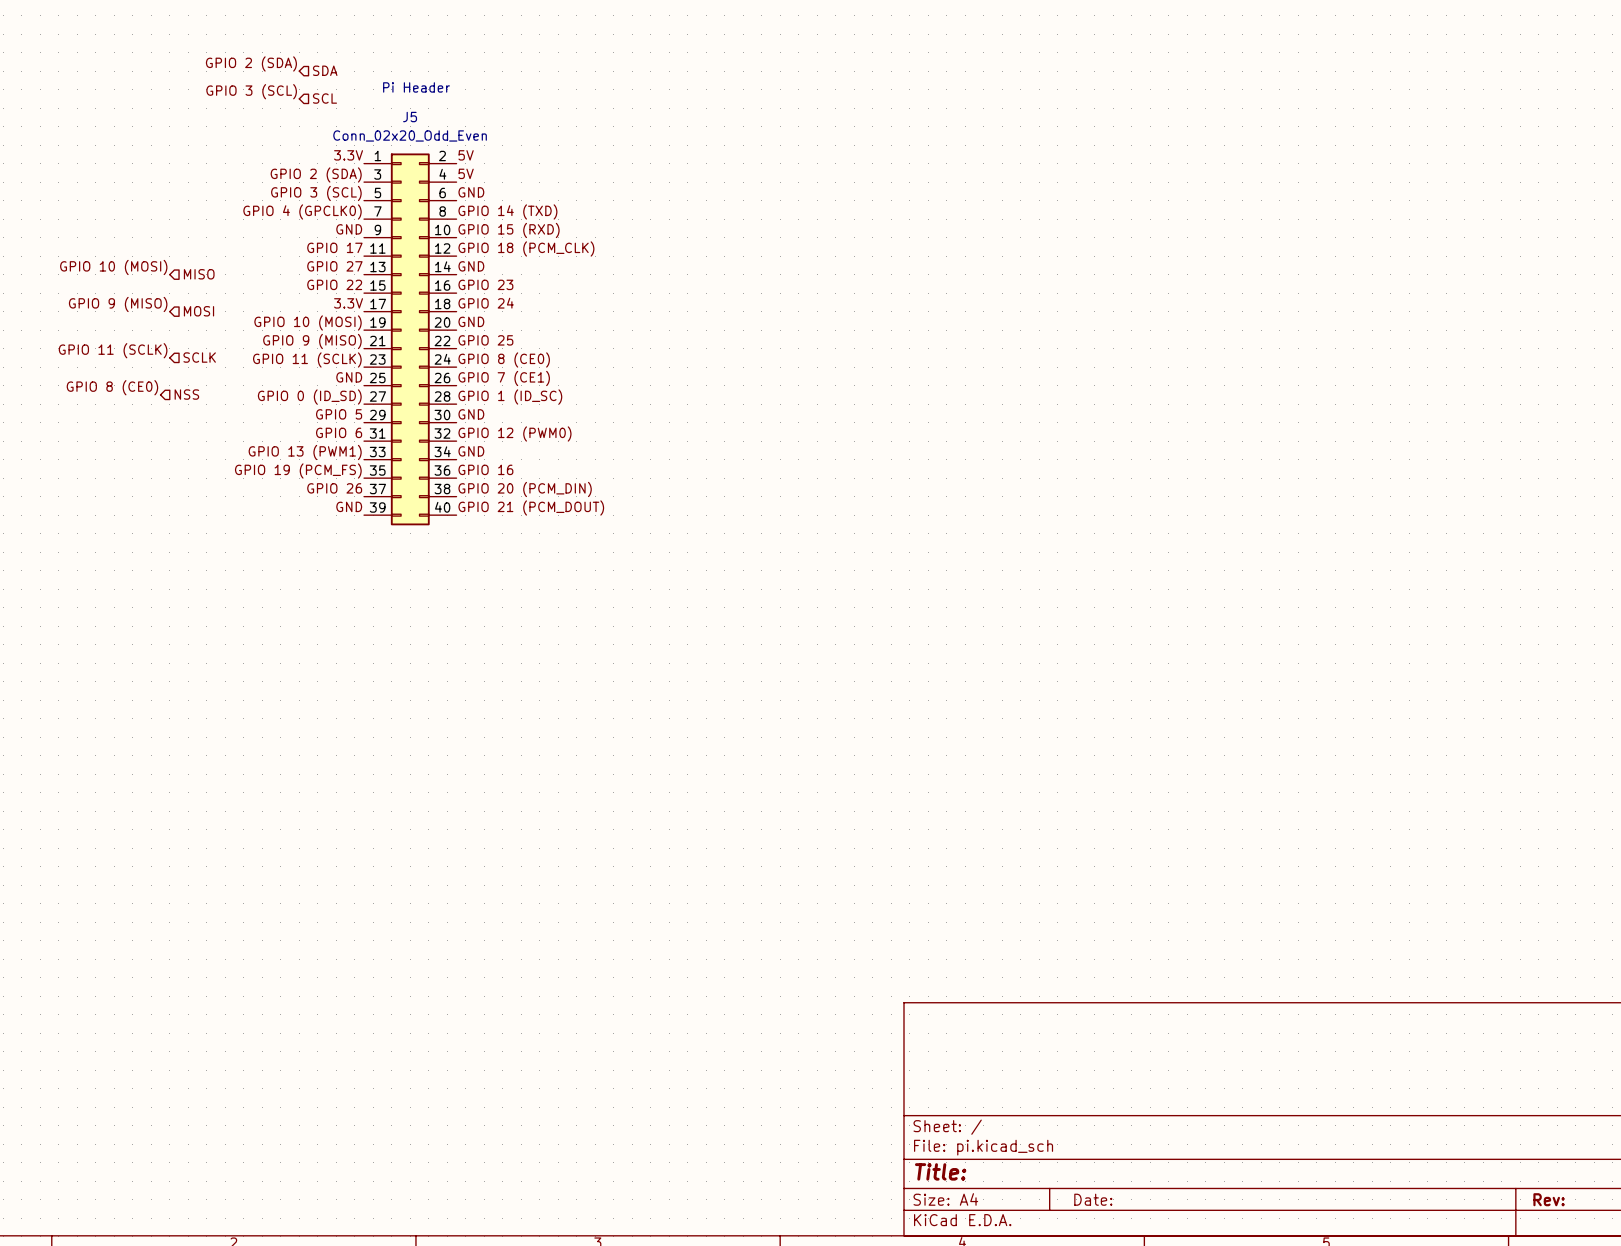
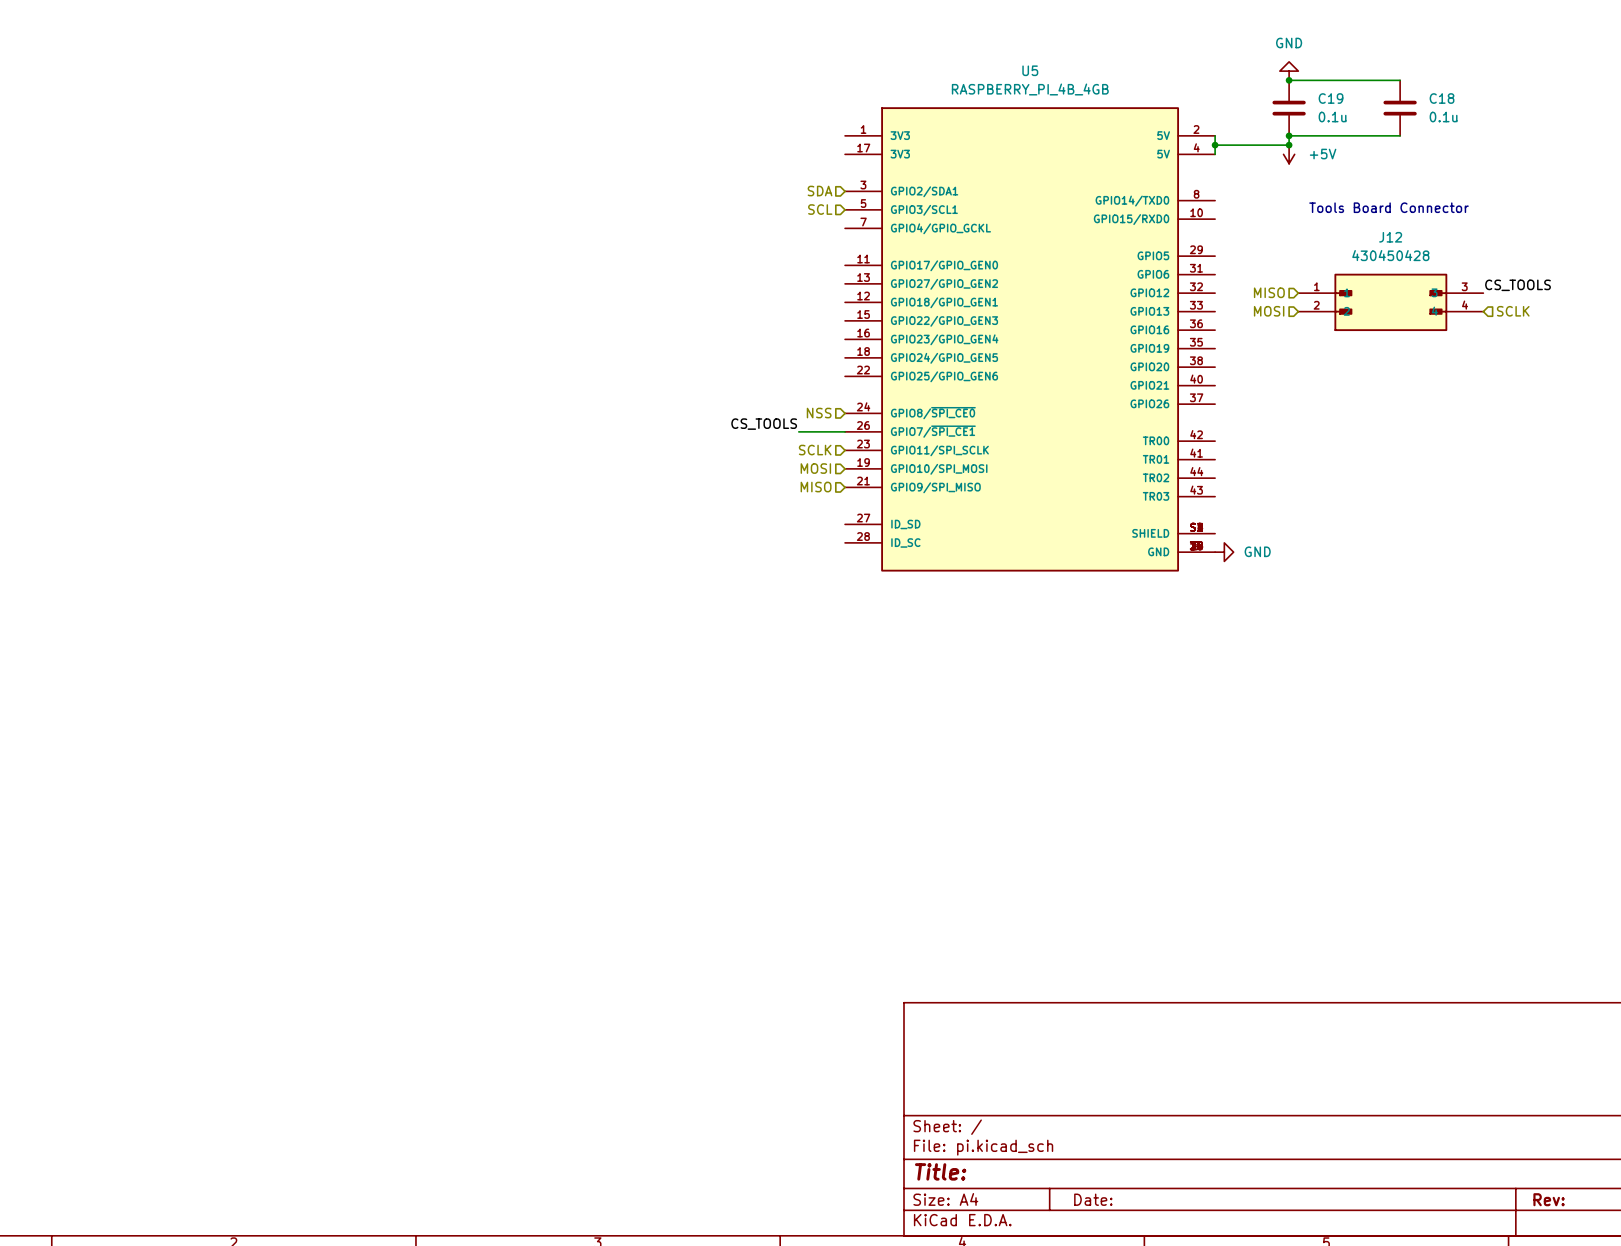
label: GPIO 2 (SDA) (251, 63) -> none
hierarchical label: SDA (325, 70) -> none
power symbol: none -> GND (1289, 71)
wire: none -> (1289, 80) (1400, 80)
junction: none -> (1289, 80)
text: Pi Header (416, 87) -> none
label: GPIO 3 (SCL) (251, 91) -> none
hierarchical label: SCL (324, 98) -> none
C19: none -> 0.1u (1289, 108)
C18: none -> 0.1u (1400, 108)
wire: none -> (1215, 135) (1215, 154)
junction: none -> (1289, 135)
wire: none -> (1400, 135) (1289, 135) (1289, 145) (1215, 145)
junction: none -> (1215, 145)
junction: none -> (1289, 145)
power symbol: none -> +5V (1289, 154)
label: 3.3V (348, 155) -> none
label: 5V (466, 155) -> none
label: 5V (466, 173) -> none
label: GPIO 2 (SDA) (316, 174) -> none
hierarchical label: none -> SDA (820, 191)
label: GND (471, 192) -> none
label: GPIO 3 (SCL) (316, 193) -> none
text: none -> Tools Board Connector (1389, 207)
hierarchical label: none -> SCL (820, 209)
label: GPIO 4 (GPCLK0) (302, 211) -> none
label: GPIO 14 (TXD) (507, 211) -> none
label: GND (349, 229) -> none
label: GPIO 15 (RXD) (509, 230) -> none
label: GPIO 17 (334, 247) -> none
label: GPIO 18 (PCM_CLK) (526, 248) -> none
label: GPIO 27 (334, 266) -> none
label: GND (471, 266) -> none
label: GPIO 10 (MOSI) (113, 267) -> none
hierarchical label: MISO (199, 274) -> none
label: GPIO 22 (334, 284) -> none
label: GPIO 23 (485, 284) -> none
label: none -> CS_TOOLS (1518, 285)
hierarchical label: none -> MISO (1269, 292)
J12: none -> 430450428 (1390, 302)
label: 3.3V (348, 303) -> none
label: GPIO 24 (486, 303) -> none
label: GPIO 9 (MISO) (118, 304) -> none
hierarchical label: MOSI (198, 311) -> none
hierarchical label: none -> MOSI (1269, 311)
hierarchical label: none -> SCLK (1513, 311)
label: GND (471, 321) -> none
label: GPIO 10 (MOSI) (308, 322) -> none
J5: Conn_02x20_Odd_Even (410, 339) -> none
U5: none -> RASPBERRY_PI_4B_4GB (1030, 339)
label: GPIO 25 (485, 340) -> none
label: GPIO 9 (MISO) (312, 341) -> none
label: GPIO 11 (SCLK) (113, 350) -> none
hierarchical label: SCLK (199, 357) -> none
label: GPIO 11 (SCLK) (307, 359) -> none
label: GPIO 8 (CE0) (504, 359) -> none
label: GND (349, 377) -> none
label: GPIO 7 (CE1) (504, 378) -> none
label: GPIO 8 (CE0) (112, 387) -> none
hierarchical label: NSS (186, 394) -> none
label: GPIO 0 (ID_SD) (309, 396) -> none
label: GPIO 1 (ID_SC) (510, 396) -> none
hierarchical label: none -> NSS (819, 413)
label: GPIO 5 (339, 414) -> none
label: GND (471, 414) -> none
label: none -> CS_TOOLS (764, 424)
wire: none -> (798, 431) (845, 431)
label: GPIO 6 (339, 432) -> none
label: GPIO 12 (PWM0) (514, 433) -> none
hierarchical label: none -> SCLK (815, 450)
label: GND (471, 451) -> none
label: GPIO 13 (PWM1) (305, 452) -> none
hierarchical label: none -> MOSI (815, 468)
label: GPIO 16 (485, 469) -> none
label: GPIO 19 (PCM_FS) (298, 470) -> none
hierarchical label: none -> MISO (816, 487)
label: GPIO 26 (334, 488) -> none
label: GPIO 20 (PCM_DIN) (525, 489) -> none
label: GND (349, 506) -> none
label: GPIO 21 (PCM_DOUT) (531, 507) -> none
power symbol: none -> GND (1224, 552)

